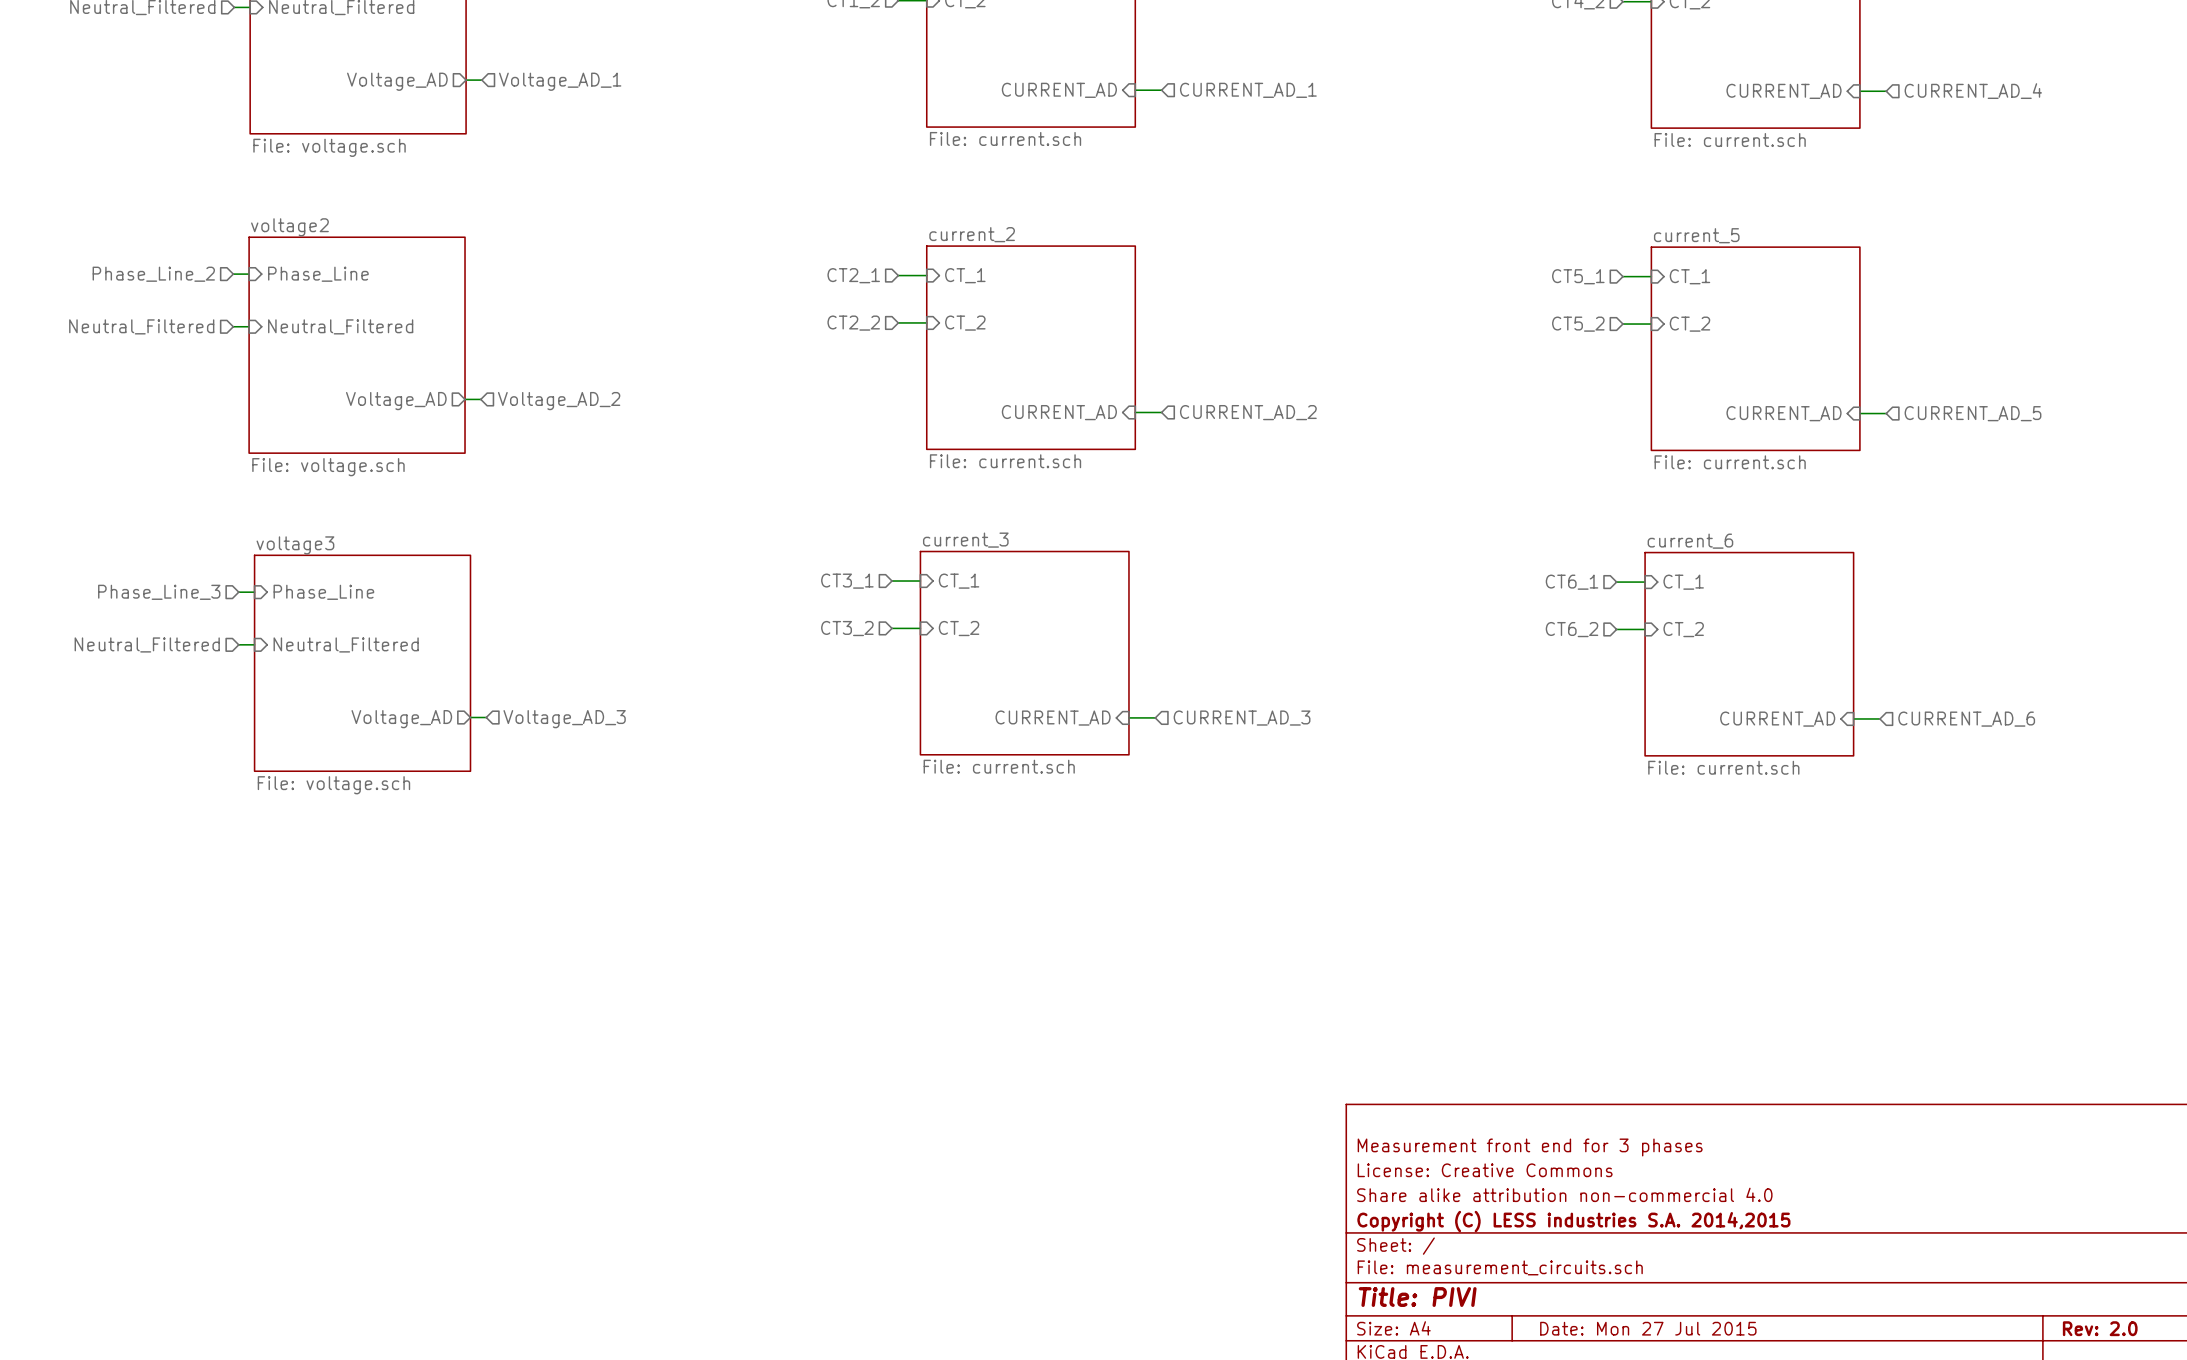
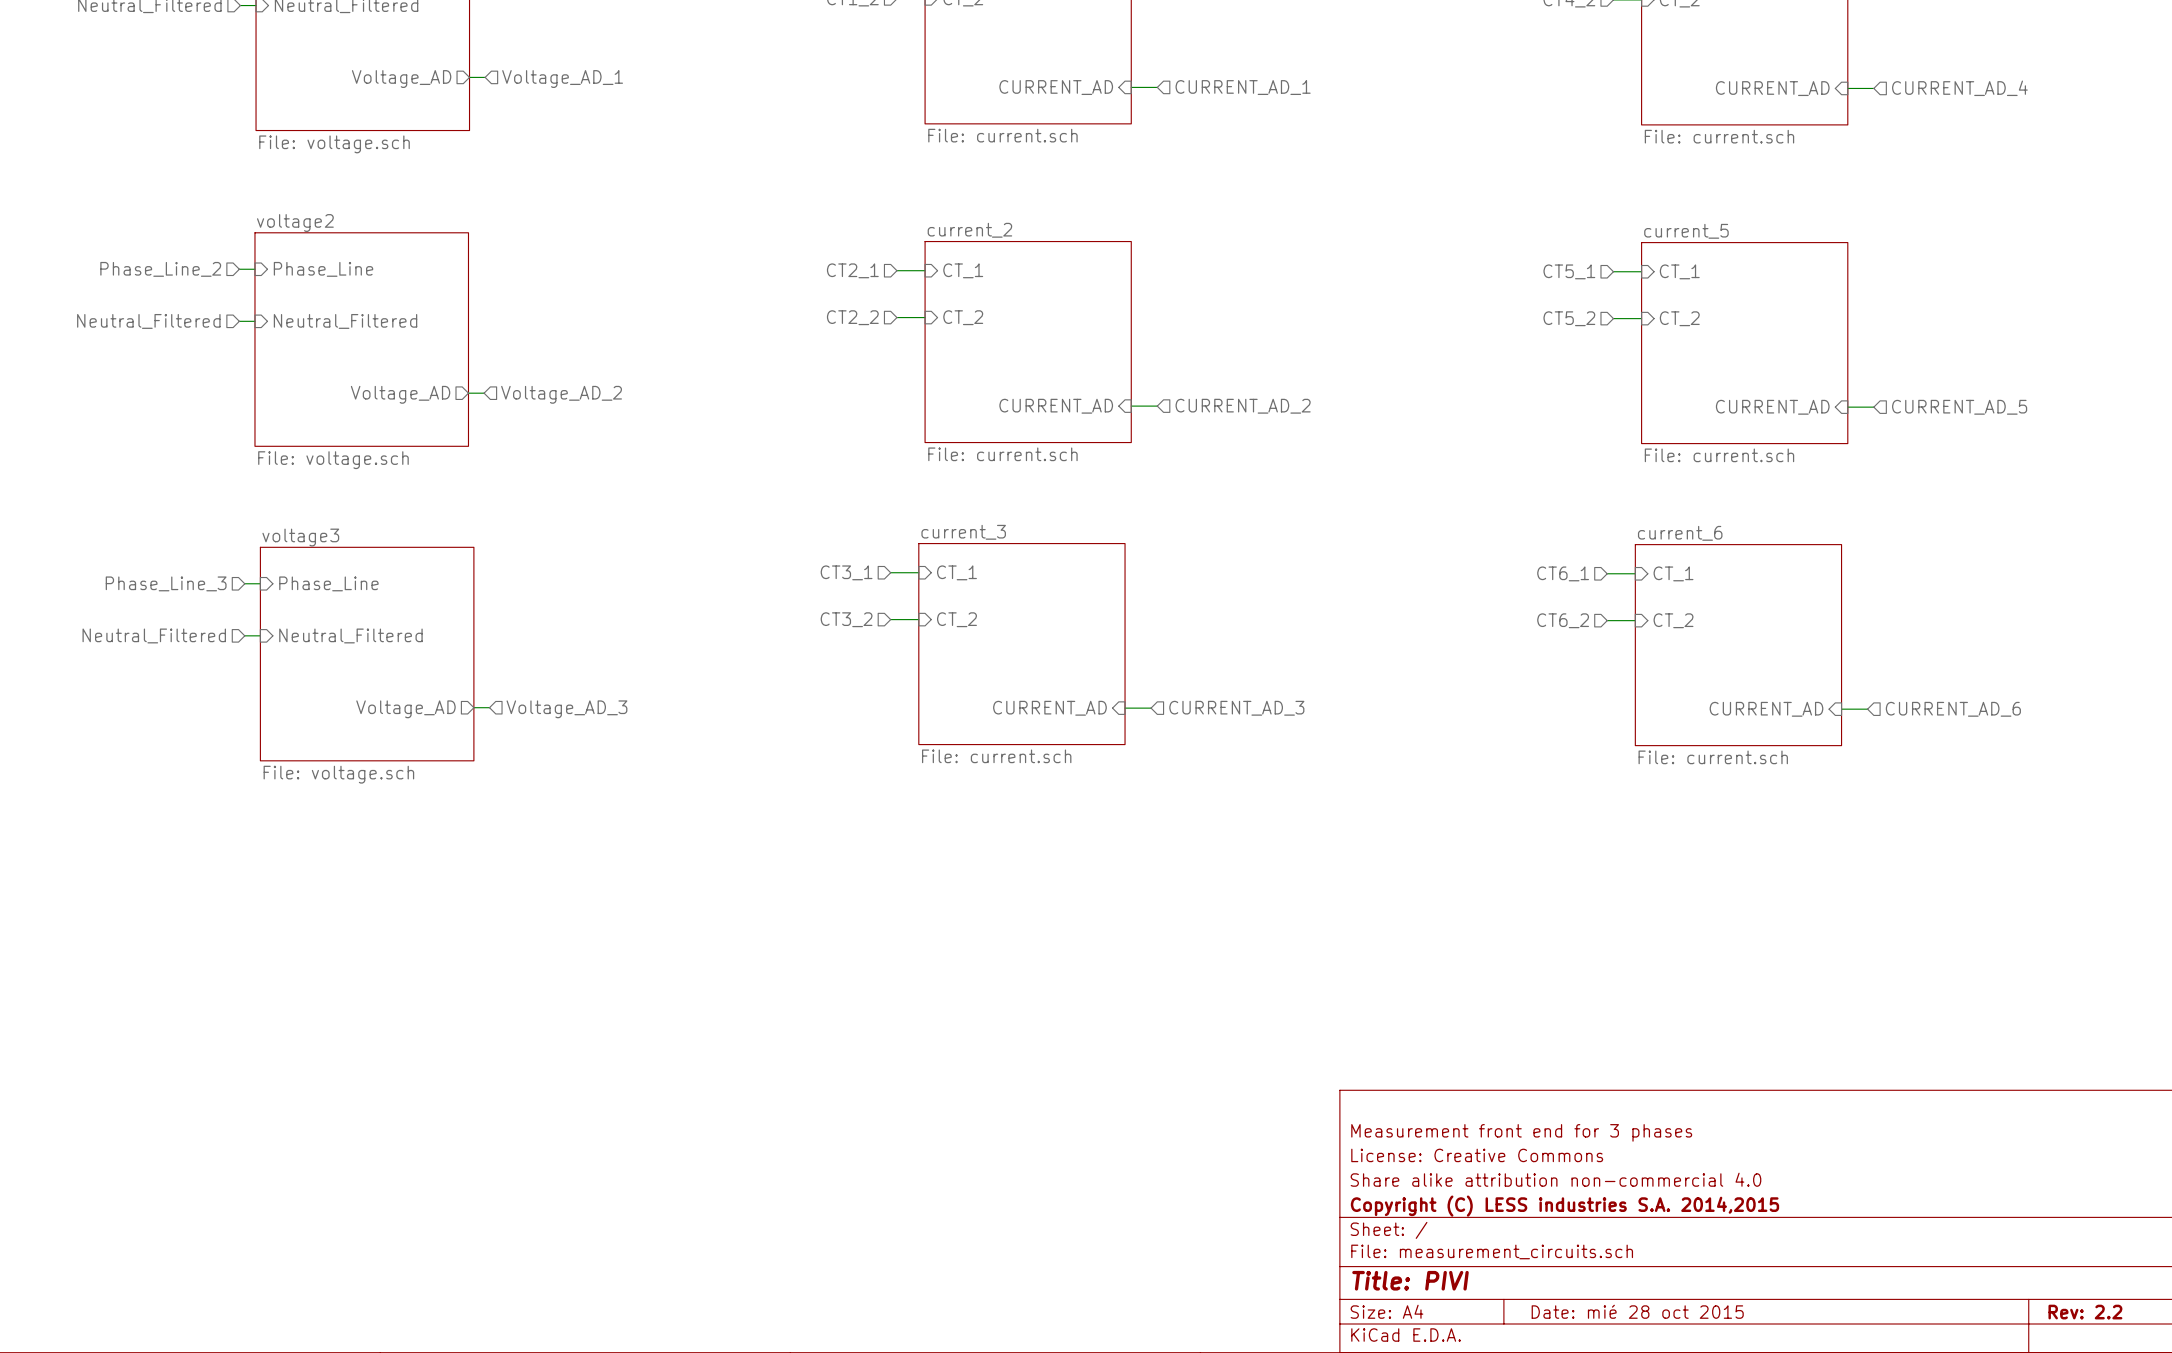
title block: Date: Mon 27 Jul 2015 (1648, 1328) -> Date: mié 28 oct 2015 (1637, 1311)
title block: Rev: 2.0 (2100, 1328) -> Rev: 2.2 (2085, 1312)

